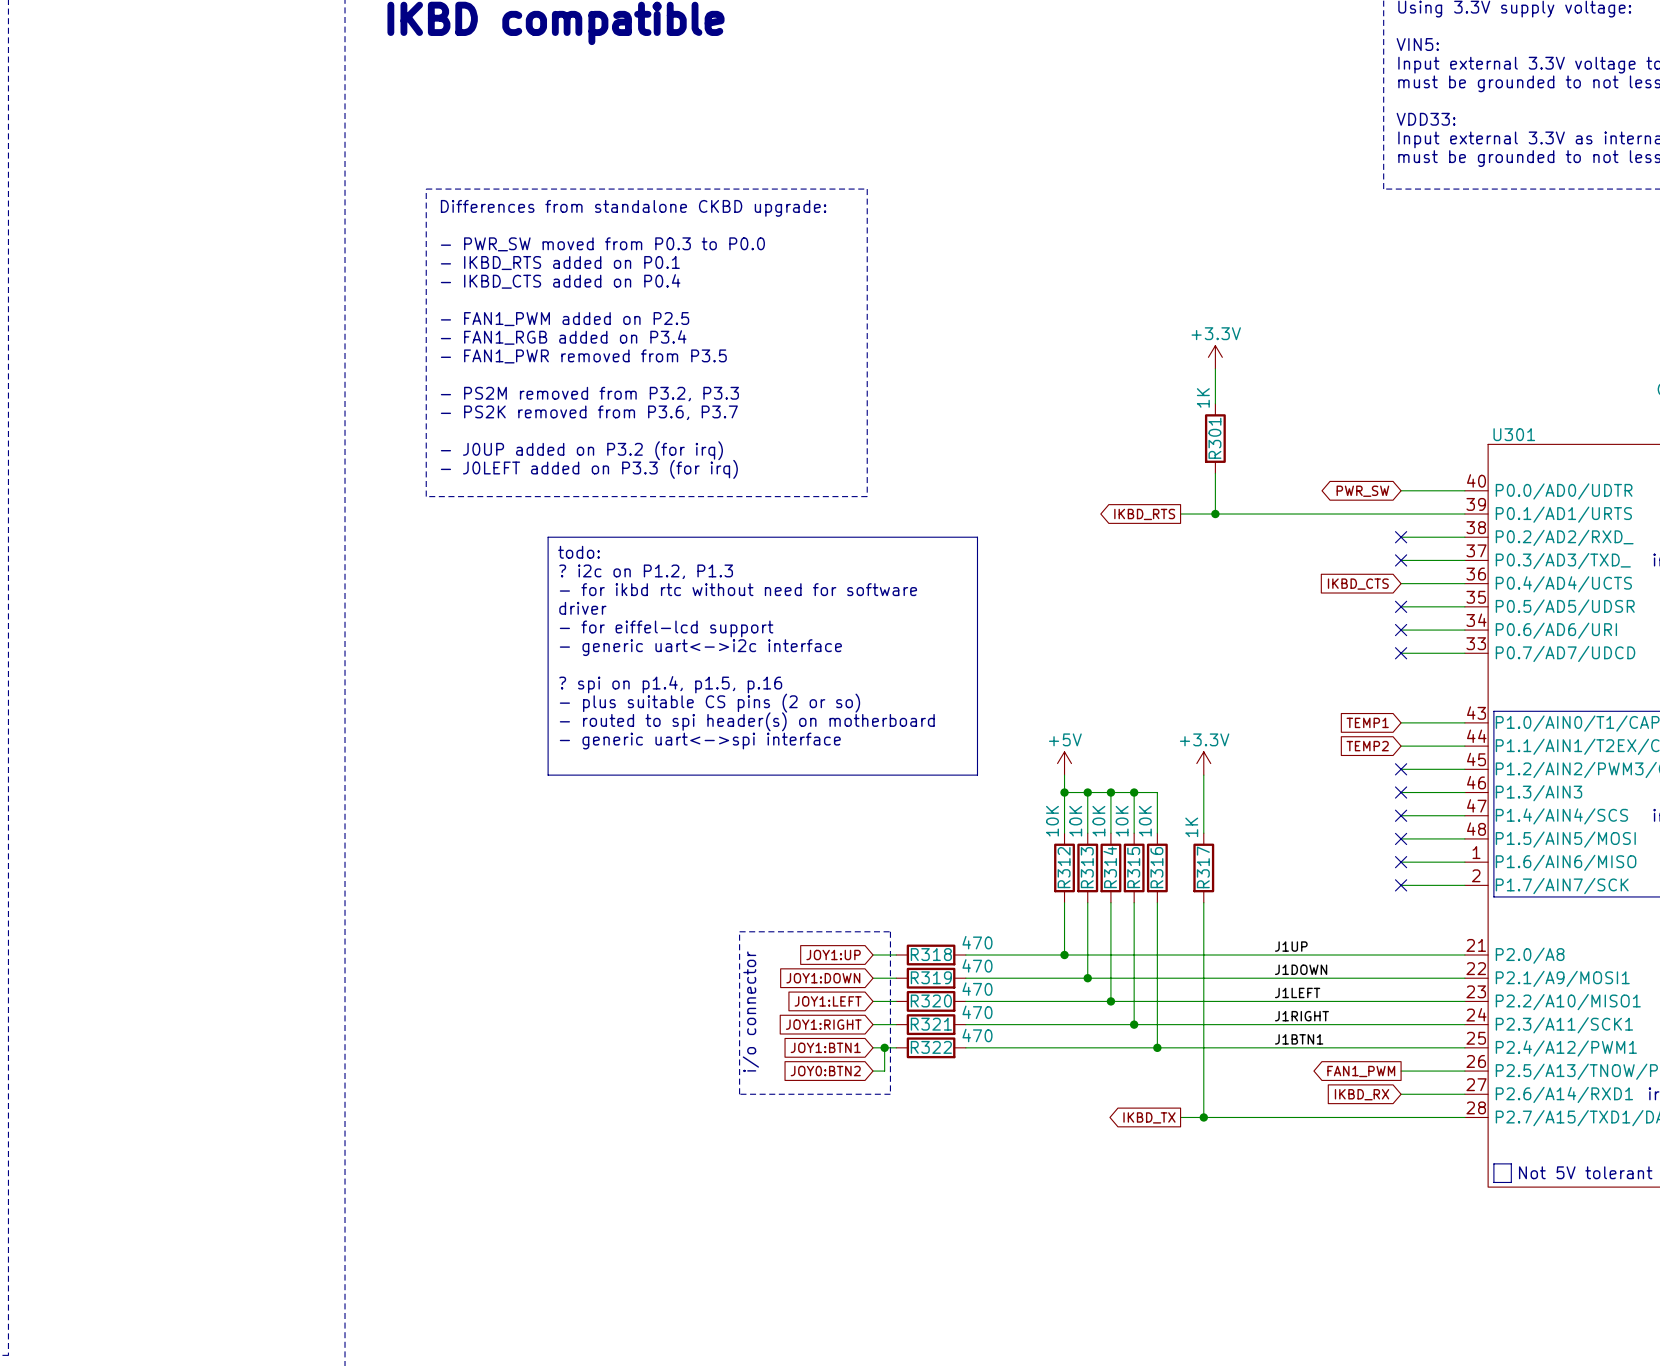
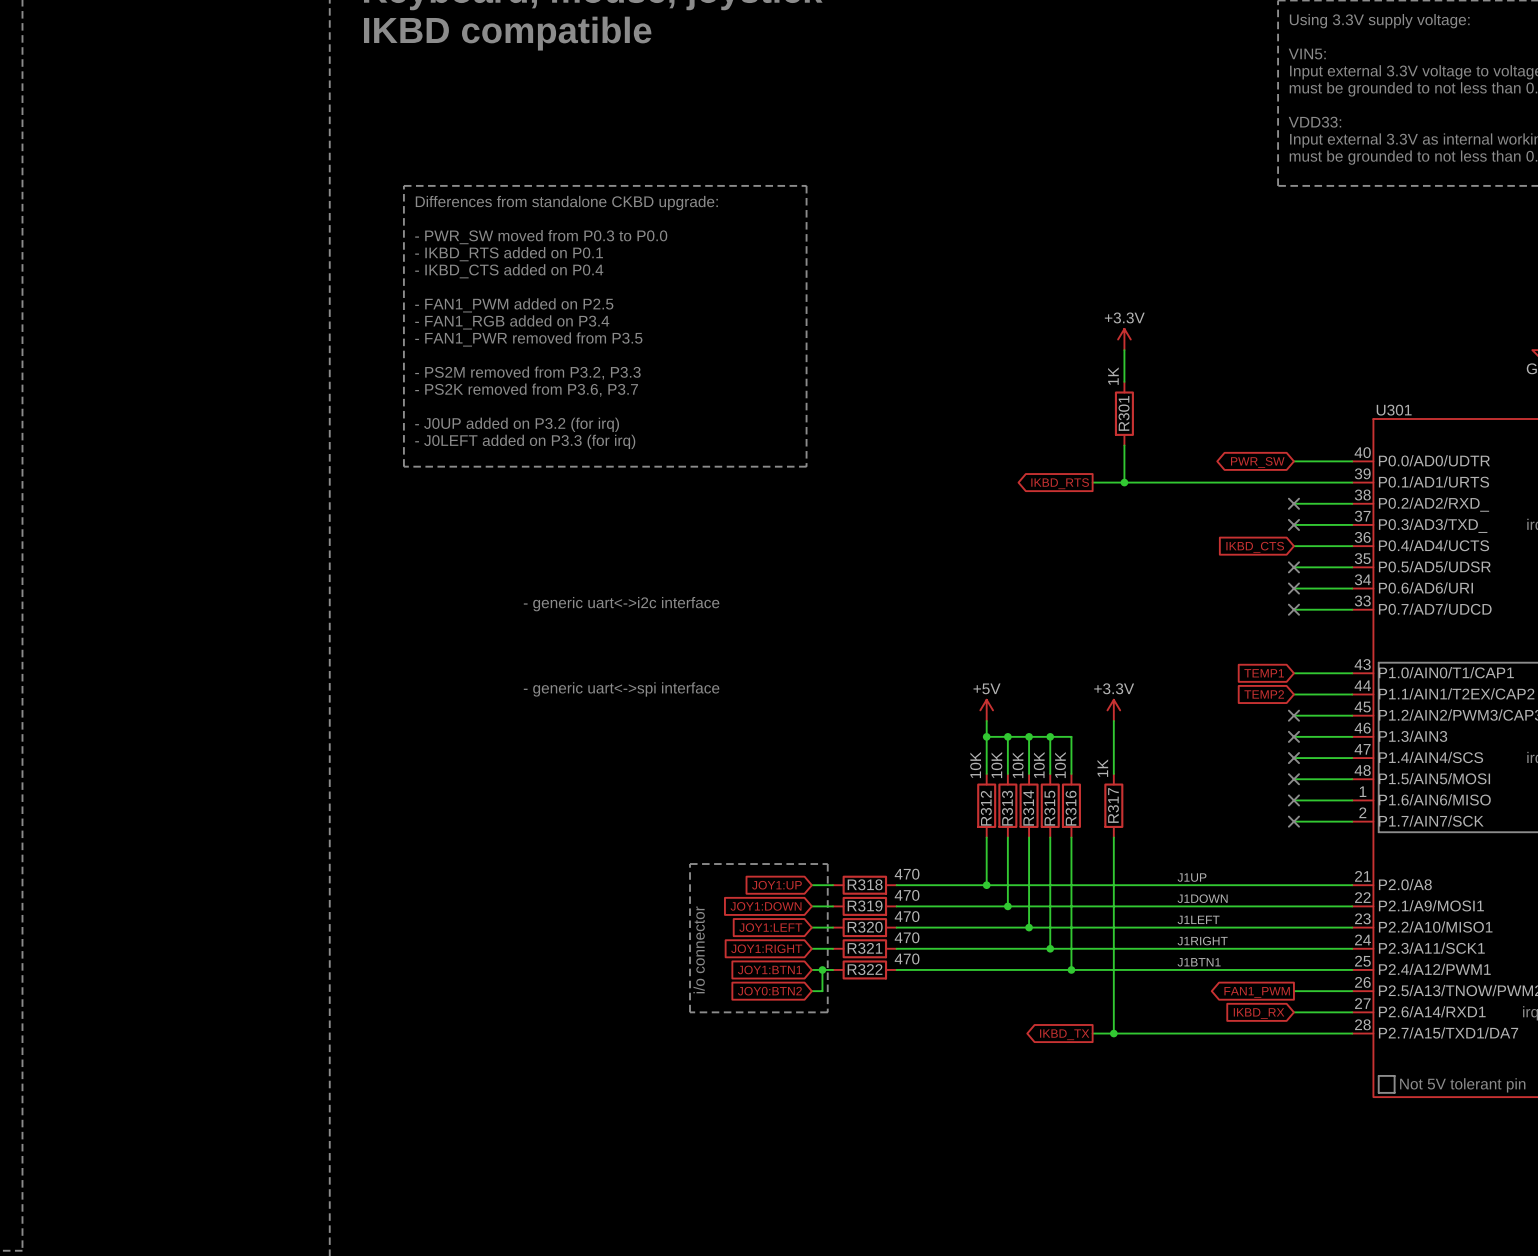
line: (548, 537) (977, 537) (977, 775) (548, 775) (548, 537) -> none
text: todo: (578, 552) -> none
text: ? i2c on P1.2, P1.3 (646, 571) -> none
text: - for ikbd rtc without need for software (738, 589) -> none
text: driver (582, 608) -> none
text: - for eiffel-lcd support (666, 628) -> none
text: ? spi on p1.4, p1.5, p.16 (670, 684) -> none
text: - plus suitable CS pins (2 or so) (709, 703) -> none
text: - routed to spi header(s) on motherboard (747, 721) -> none

